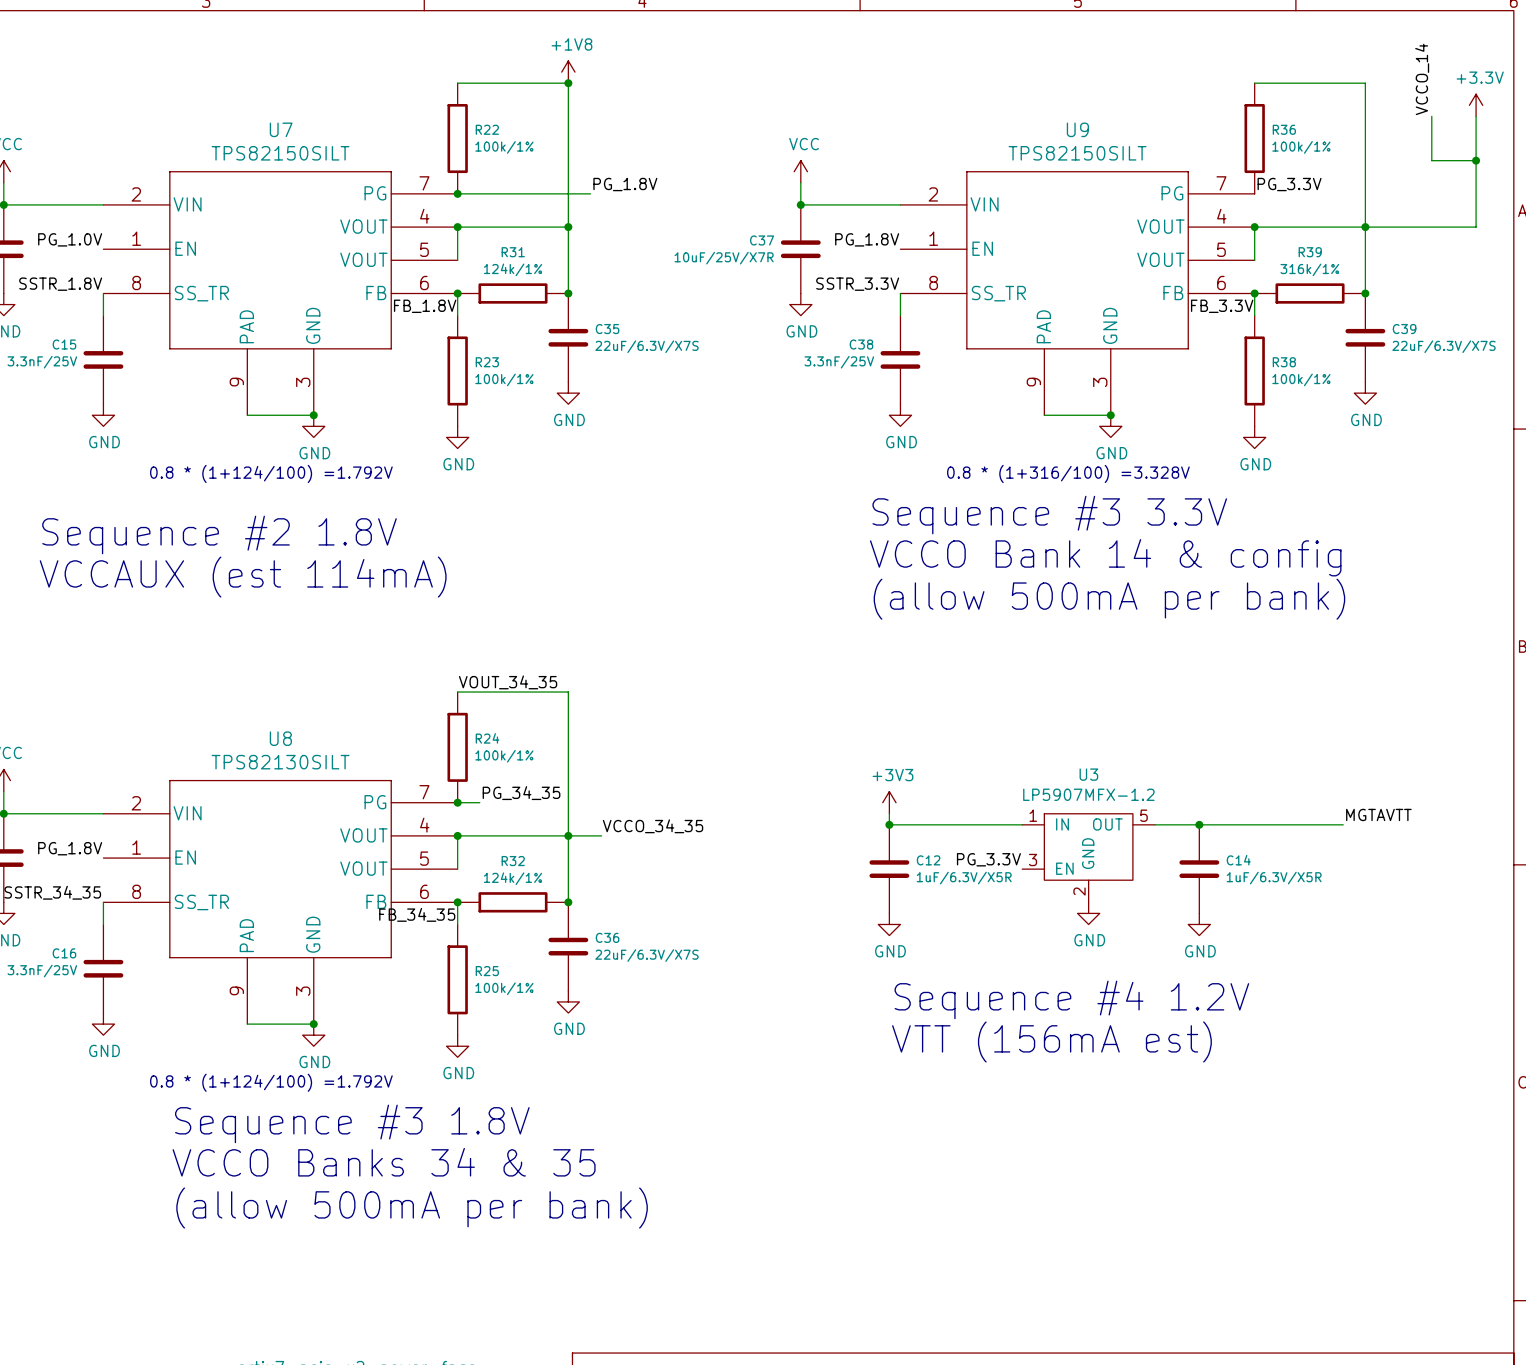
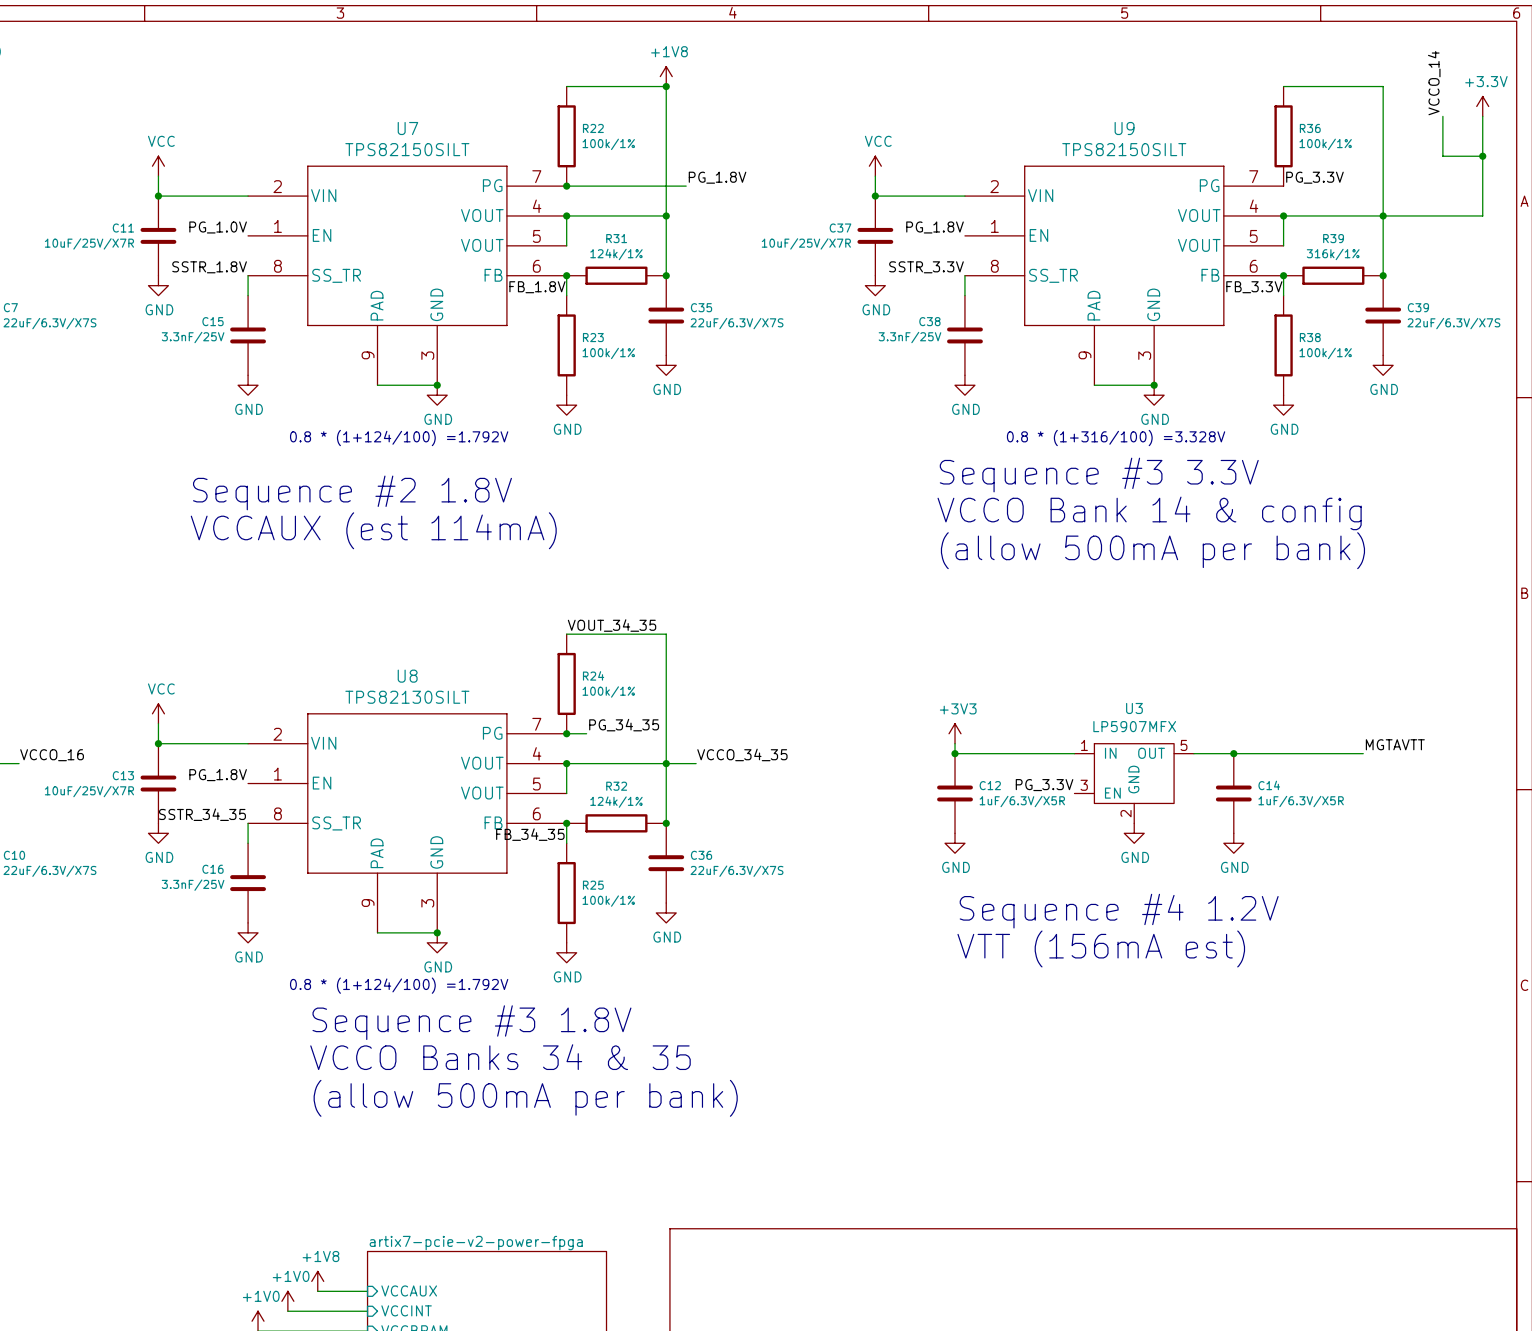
U3 value: LP5907MFX-1.2 (1088, 794) -> LP5907MFX (1134, 726)

